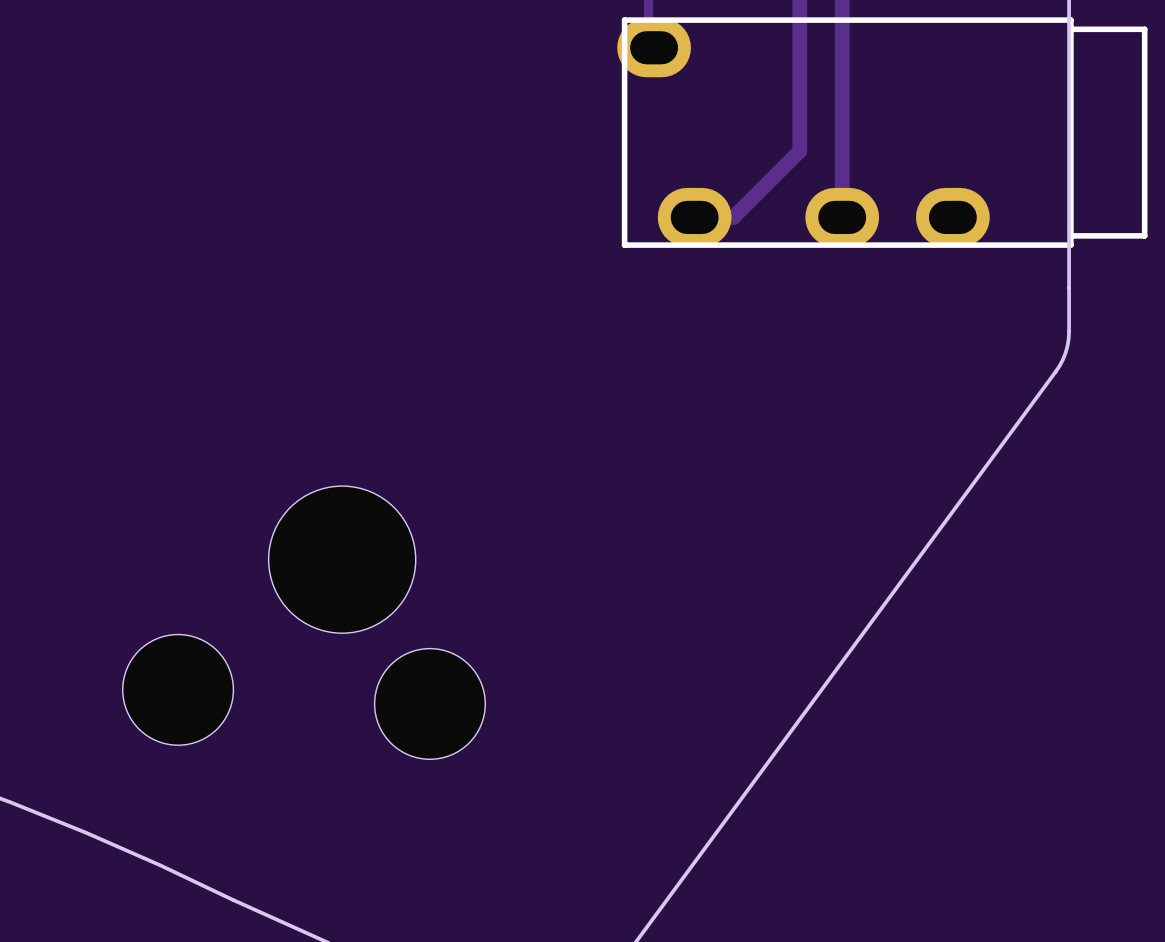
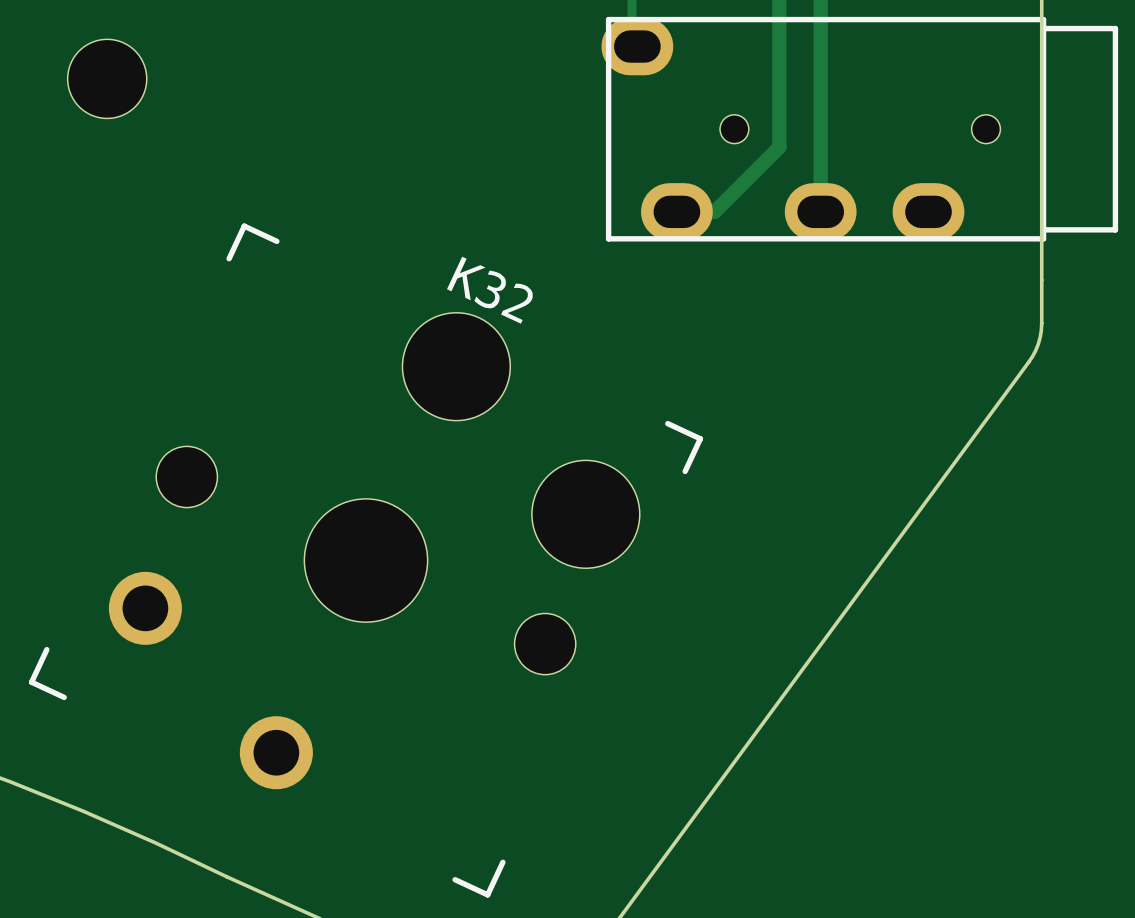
part footprint: [617, 17, 1148, 248] -> [601, 16, 1119, 242]
part: none -> (107, 78)
K32: none -> (366, 560)
part: (304, 622) -> none

